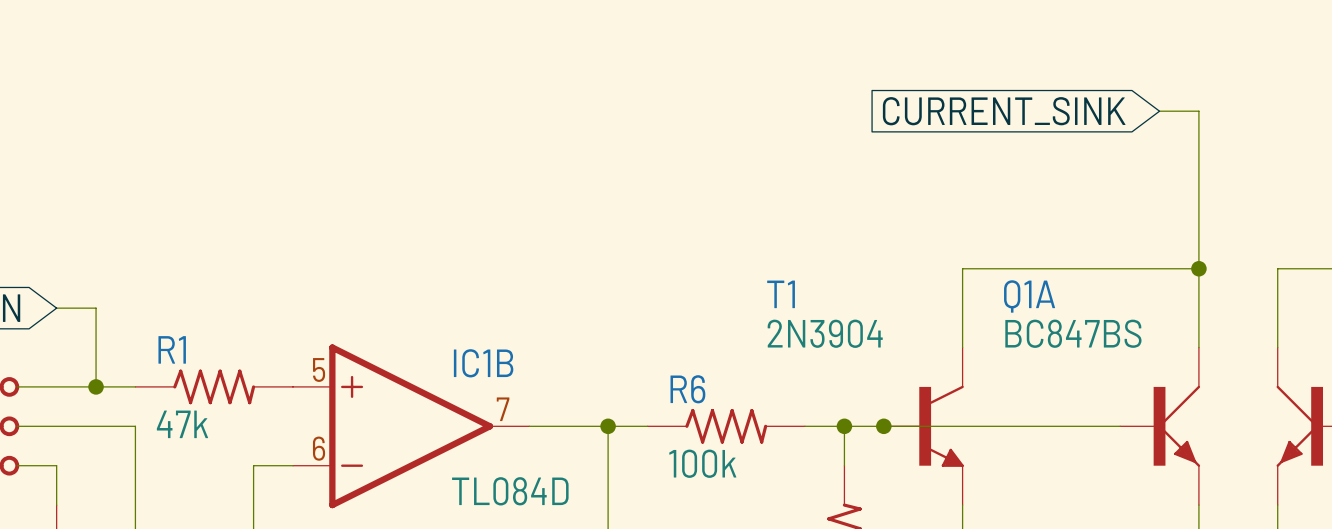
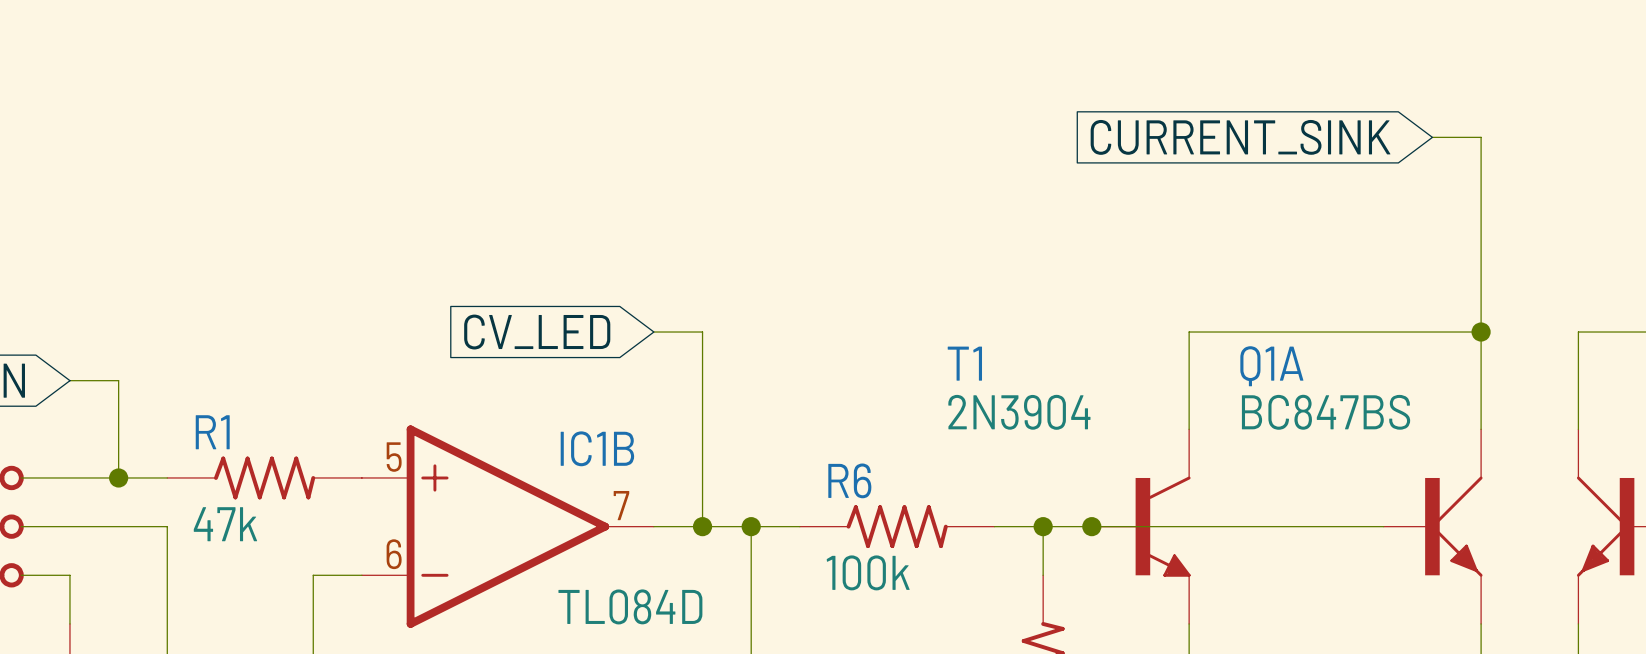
global label: none -> CV_LED (537, 332)
wire: none -> (653, 332) (702, 332) (702, 526)
junction: none -> (702, 526)

